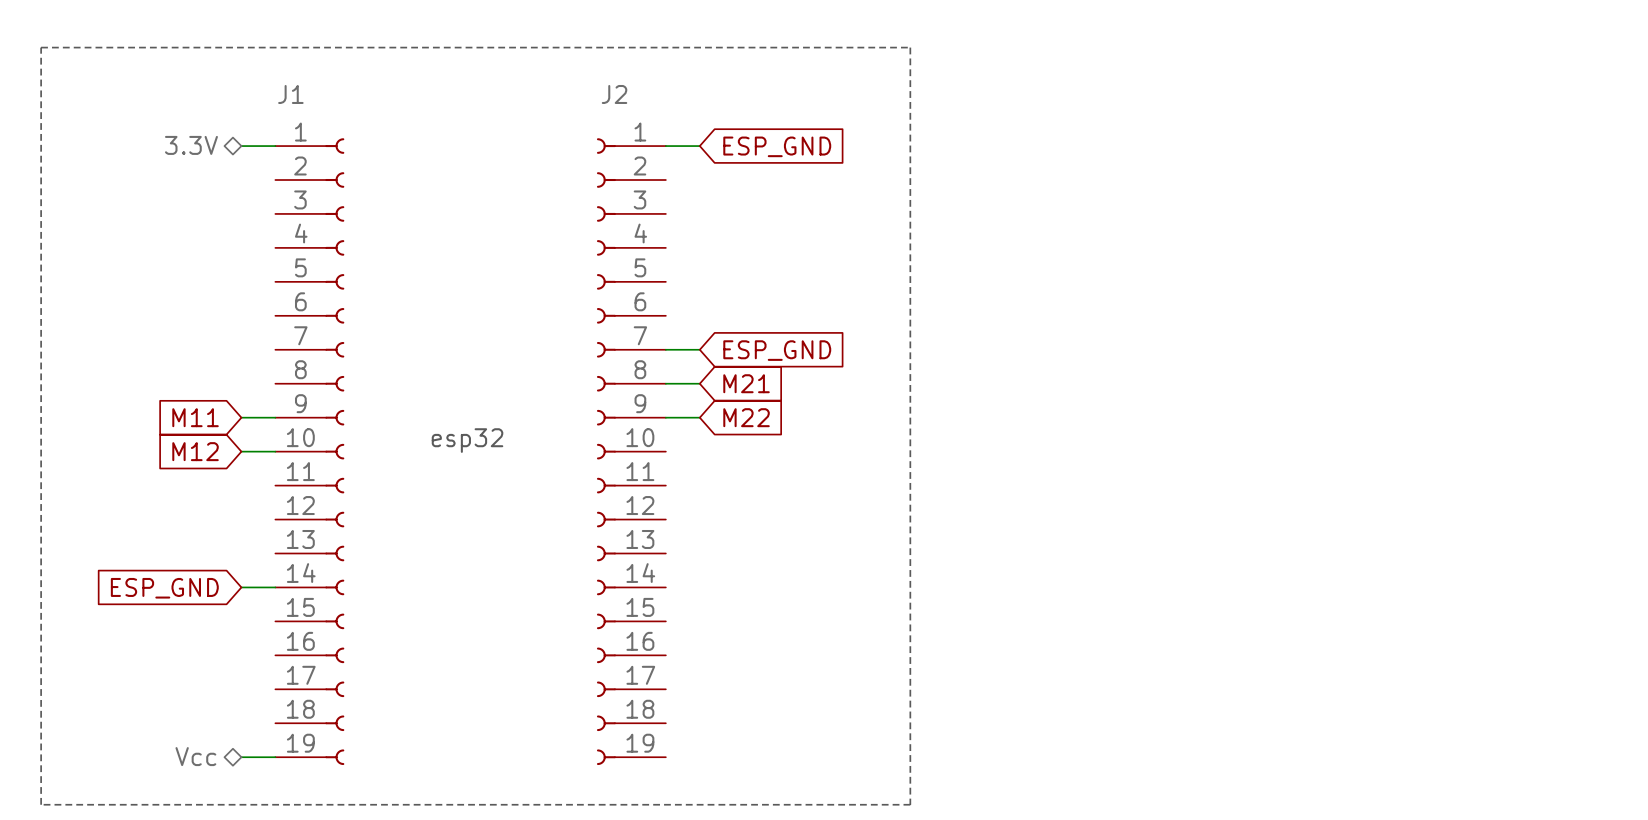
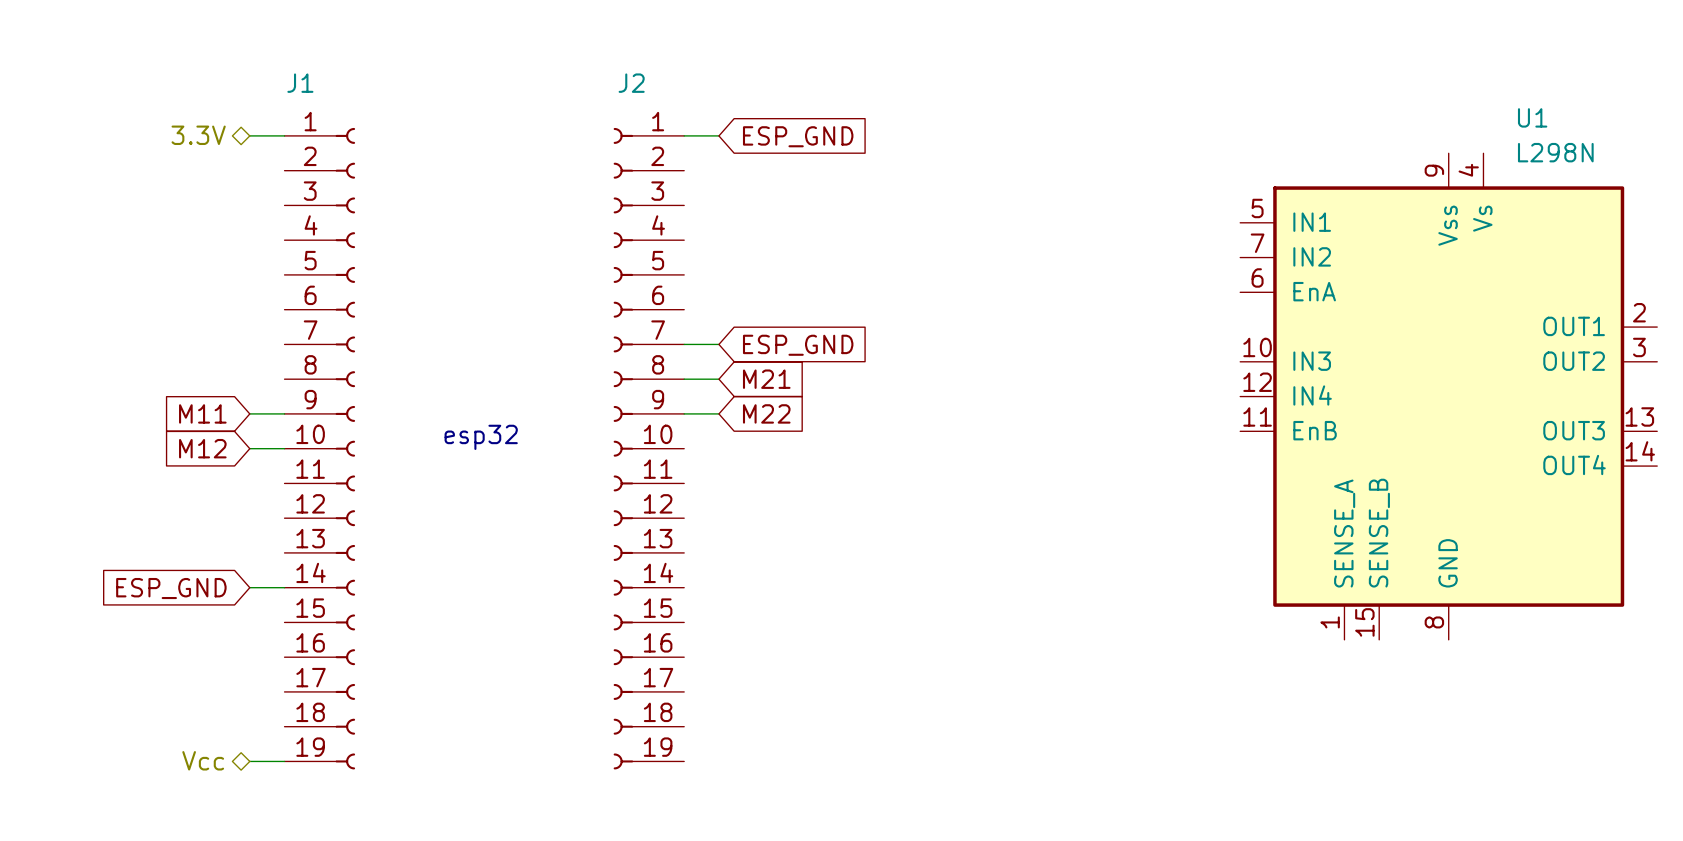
line: (41, 47) (910, 47) (910, 804) (41, 804) (41, 47) -> none
U1: none -> L298N (1448, 396)

